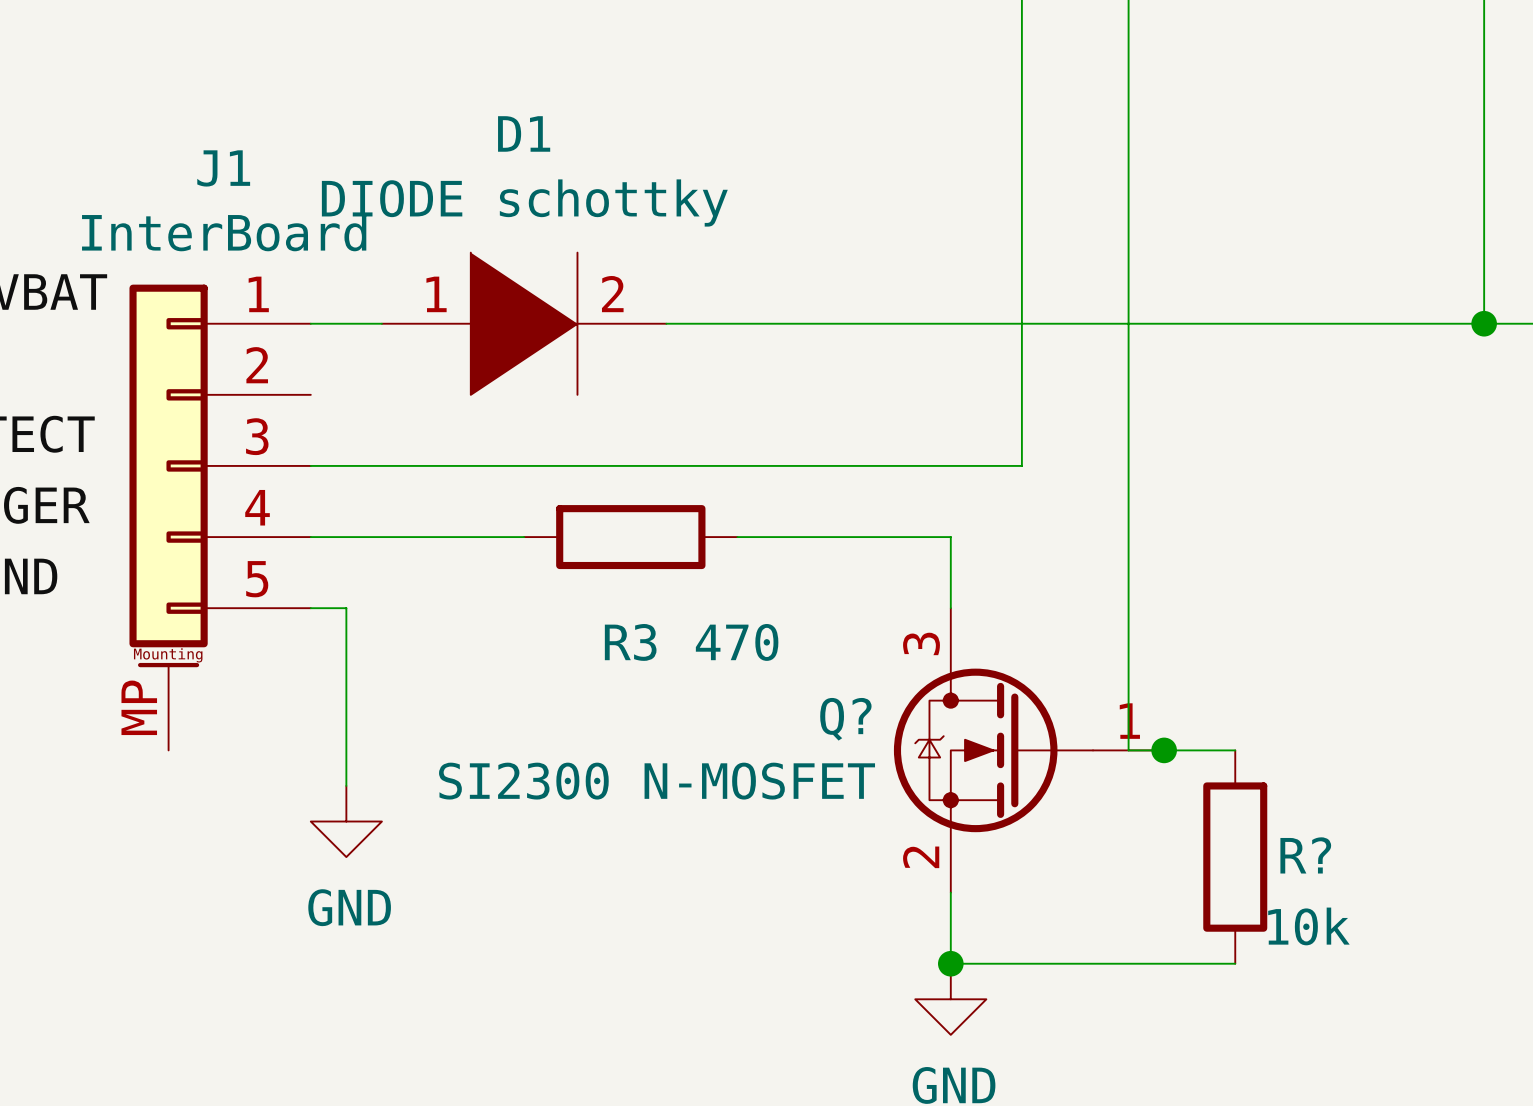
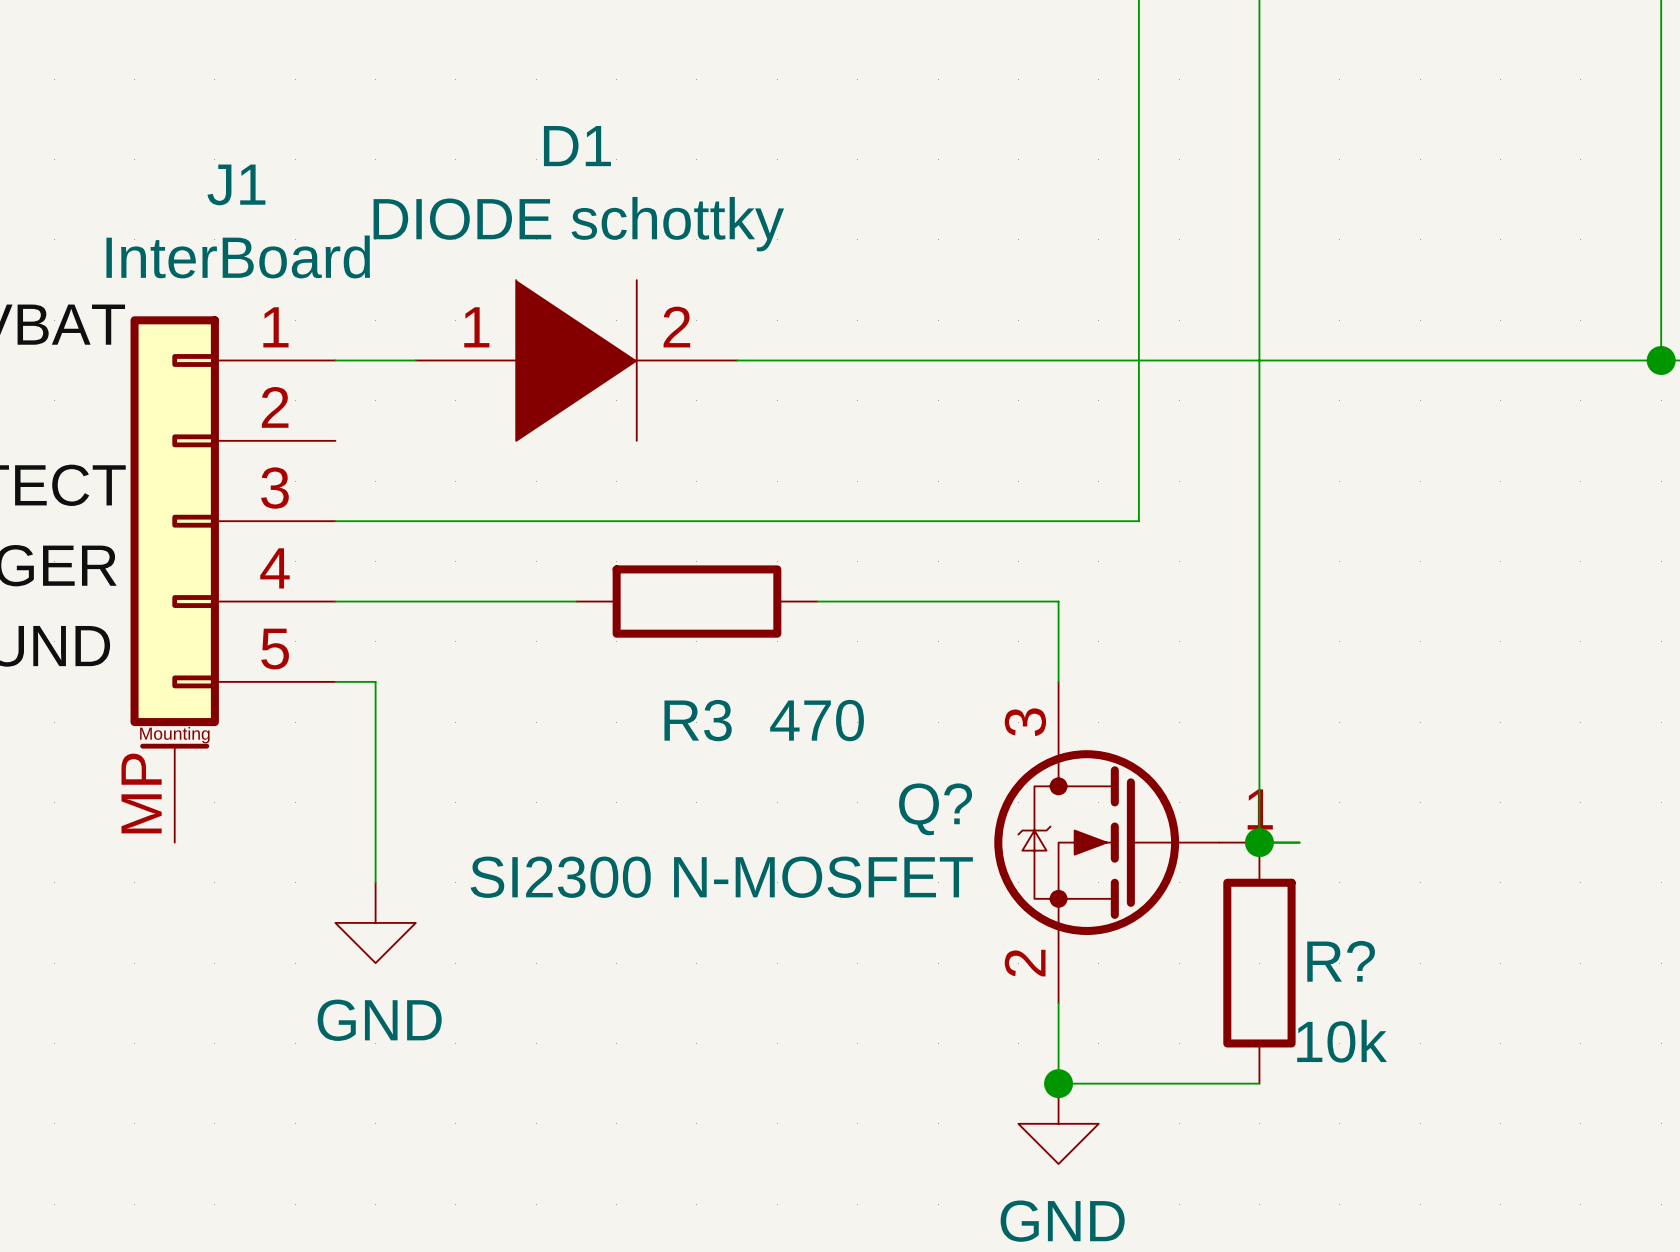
wire: (1164, 750) (1235, 750) -> none
junction position: (1164, 750) -> (1259, 842)
R? position: (1235, 857) -> (1259, 963)
wire: (1128, 963) (1235, 963) -> none

